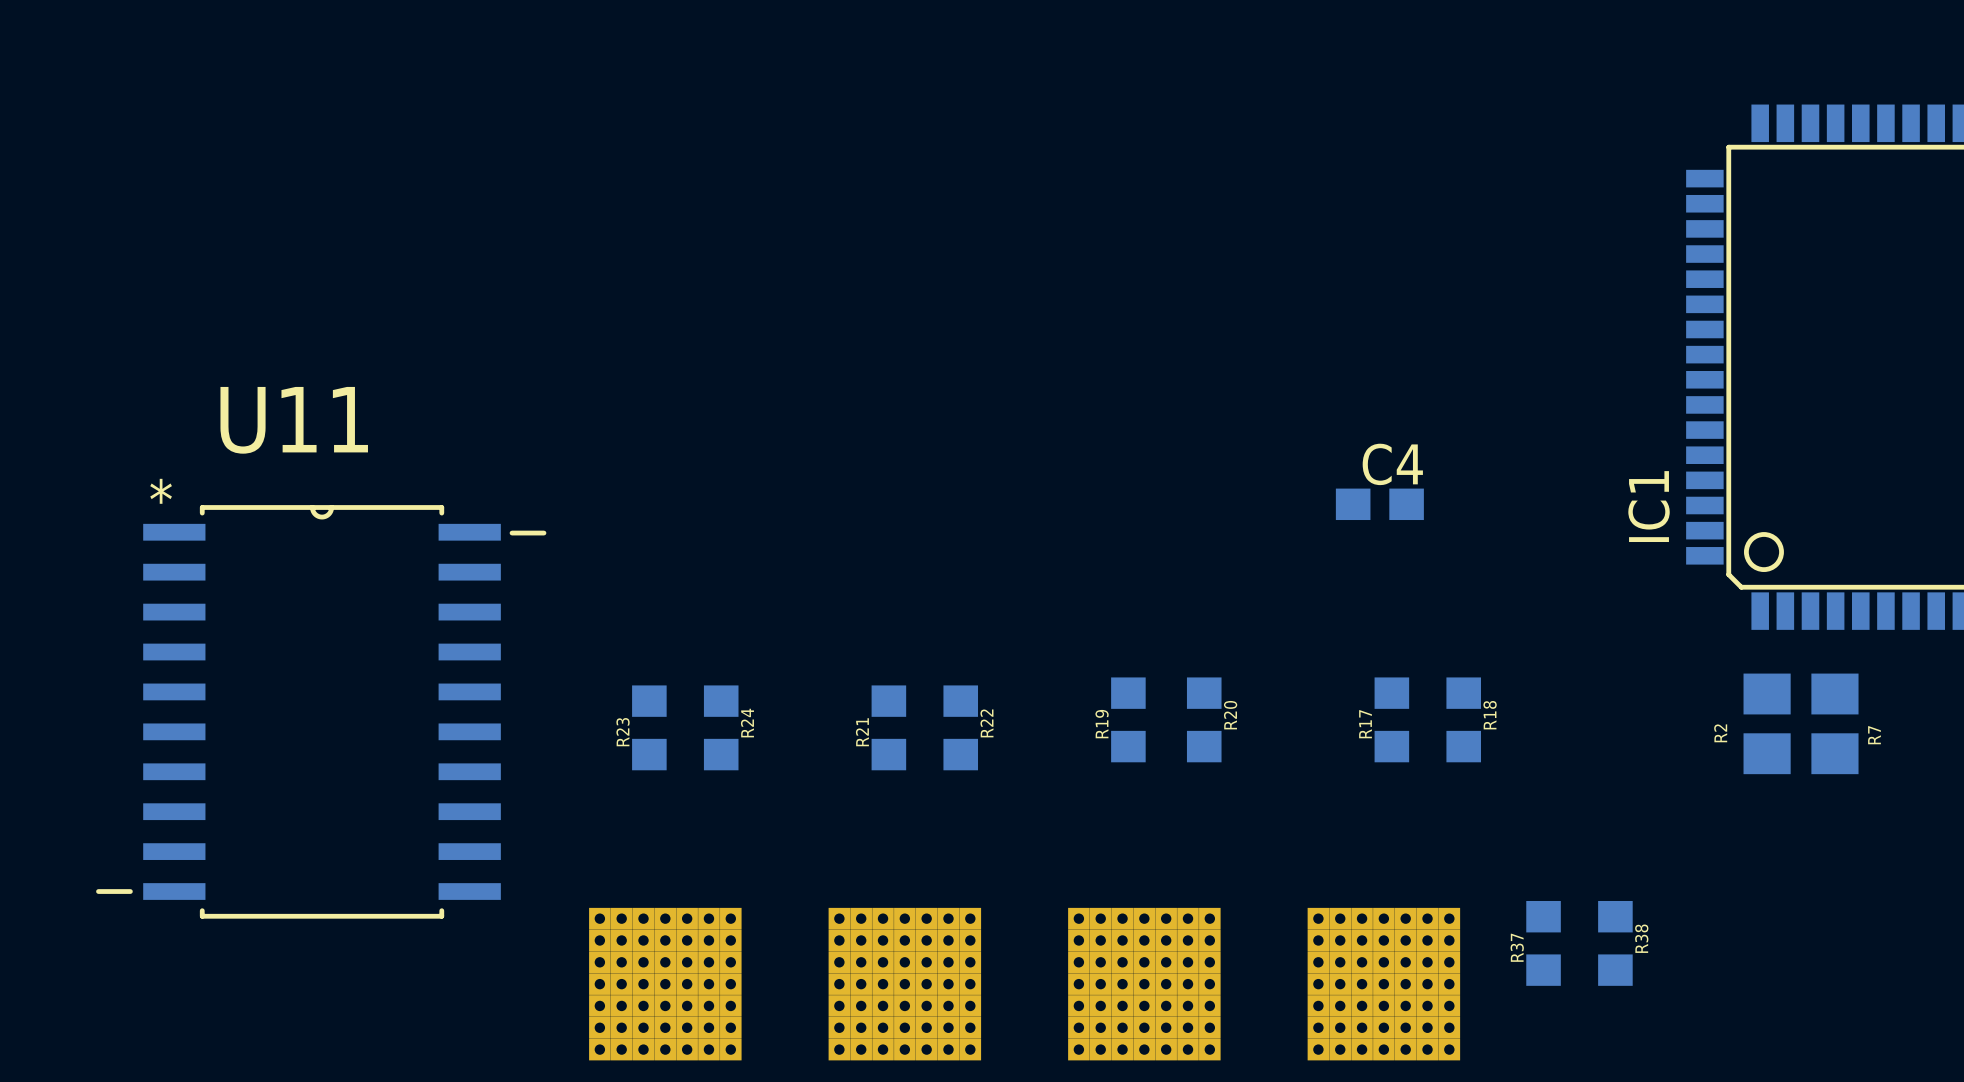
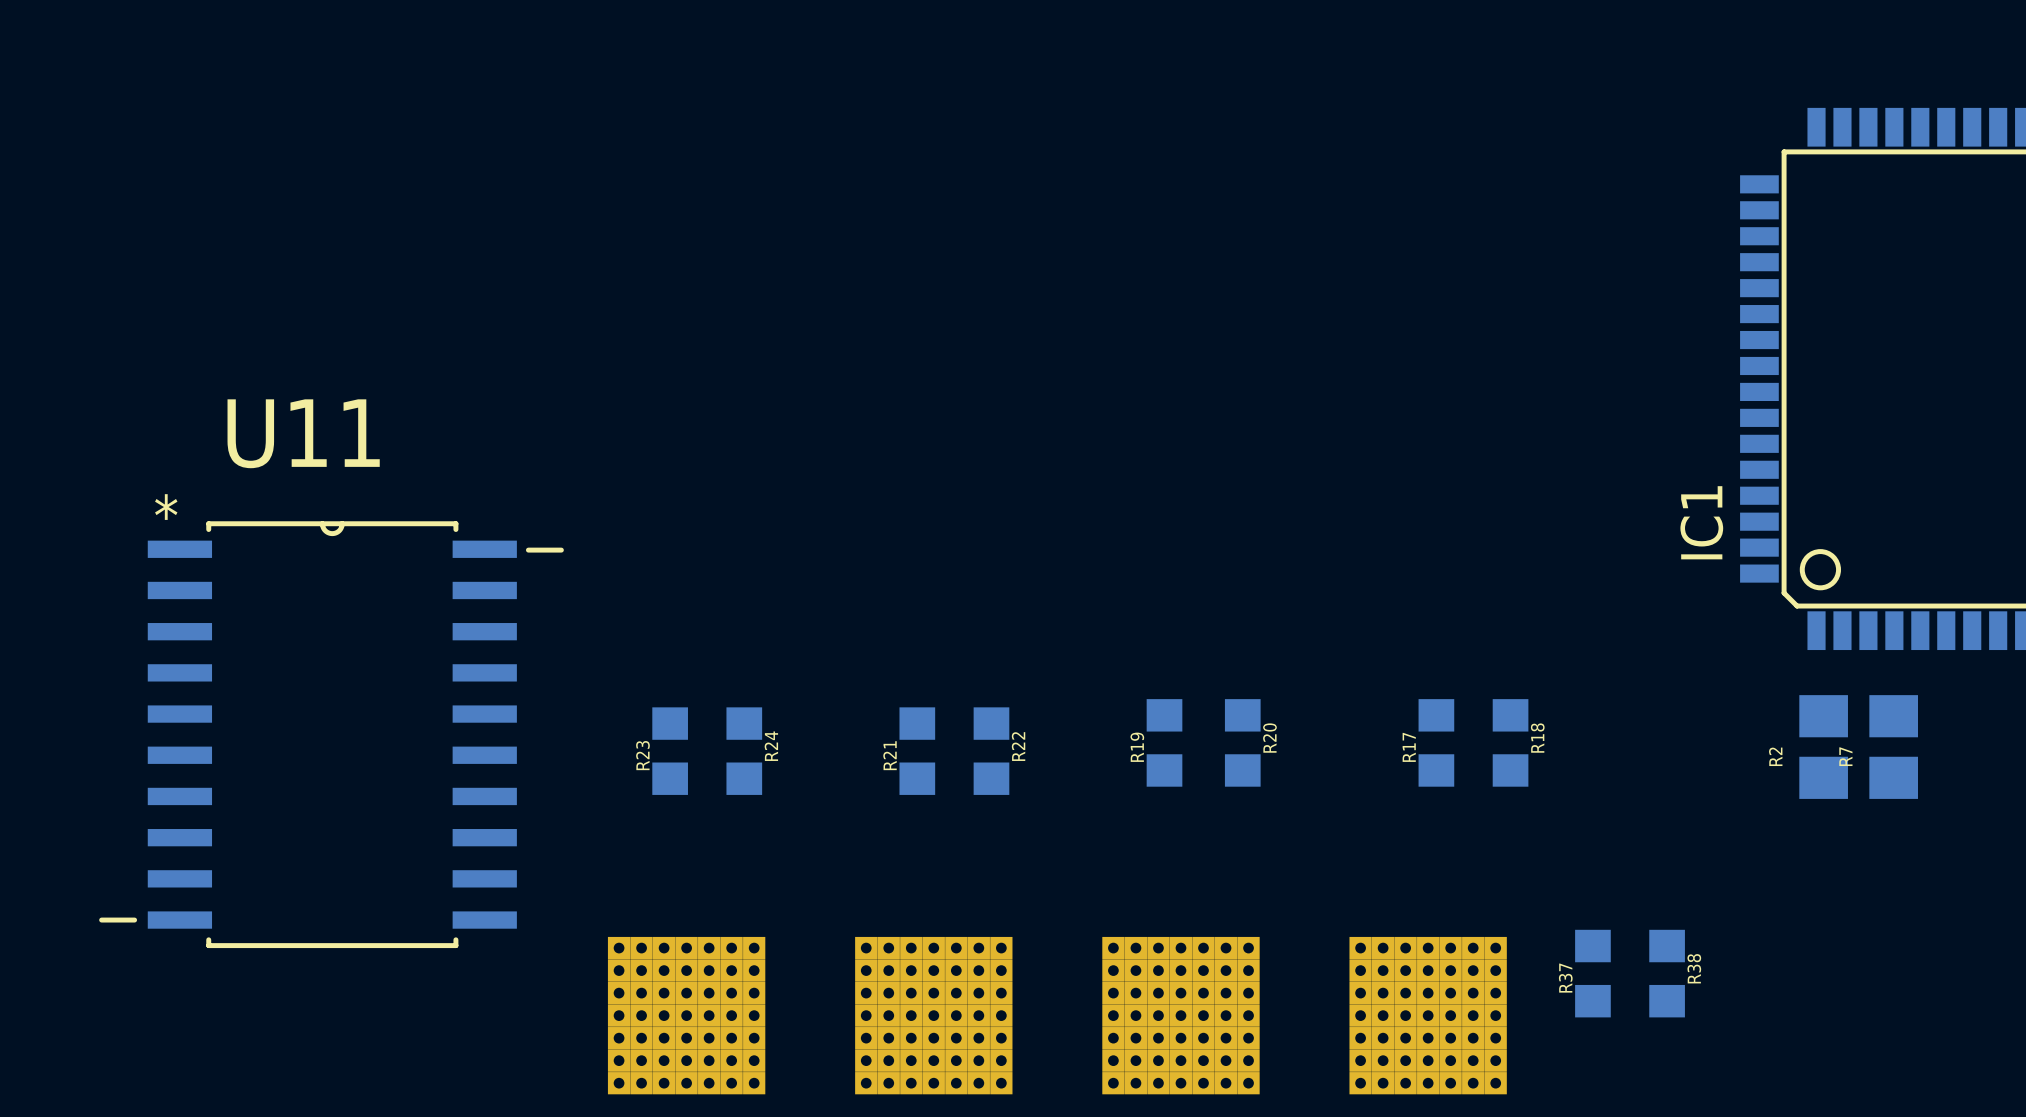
C4: (1379, 504) -> none
R7 name position: R7 (1874, 735) -> R7 (1845, 756)

